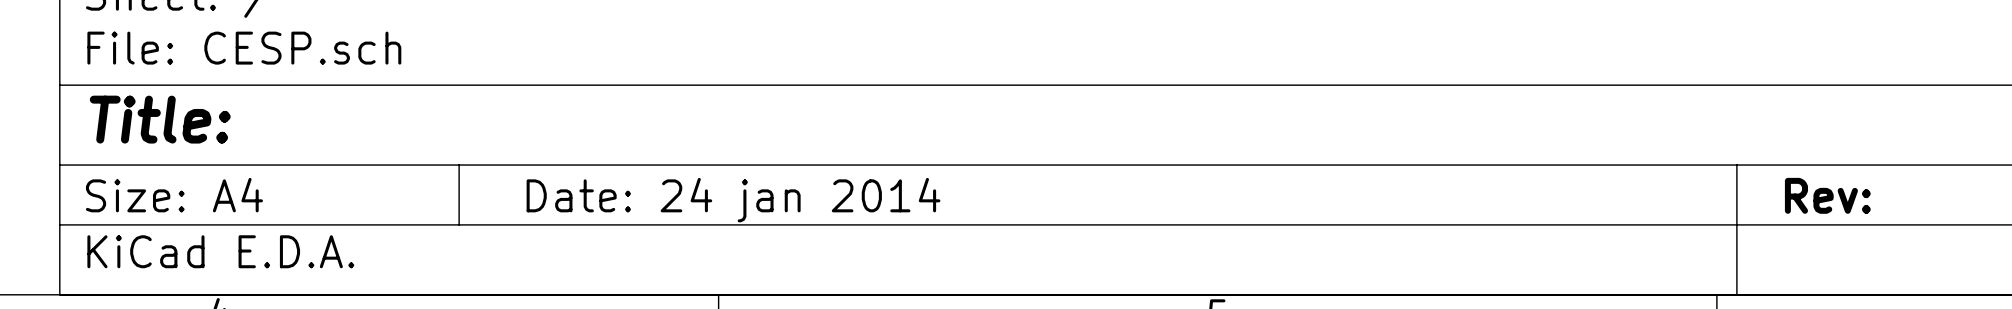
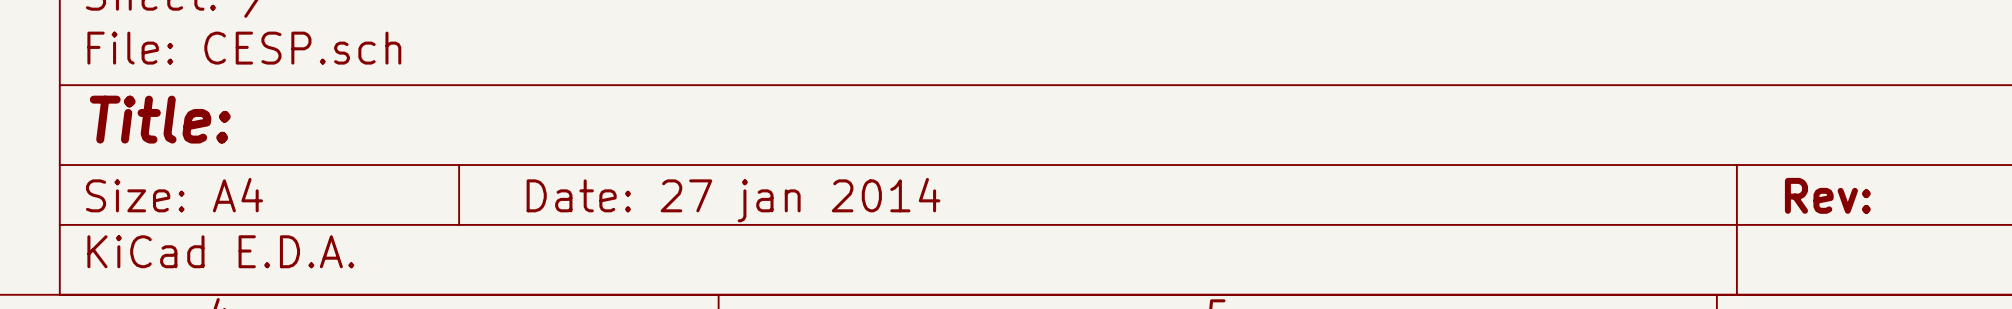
title block: Date: 24 jan 2014 (733, 200) -> Date: 27 jan 2014 (733, 200)

